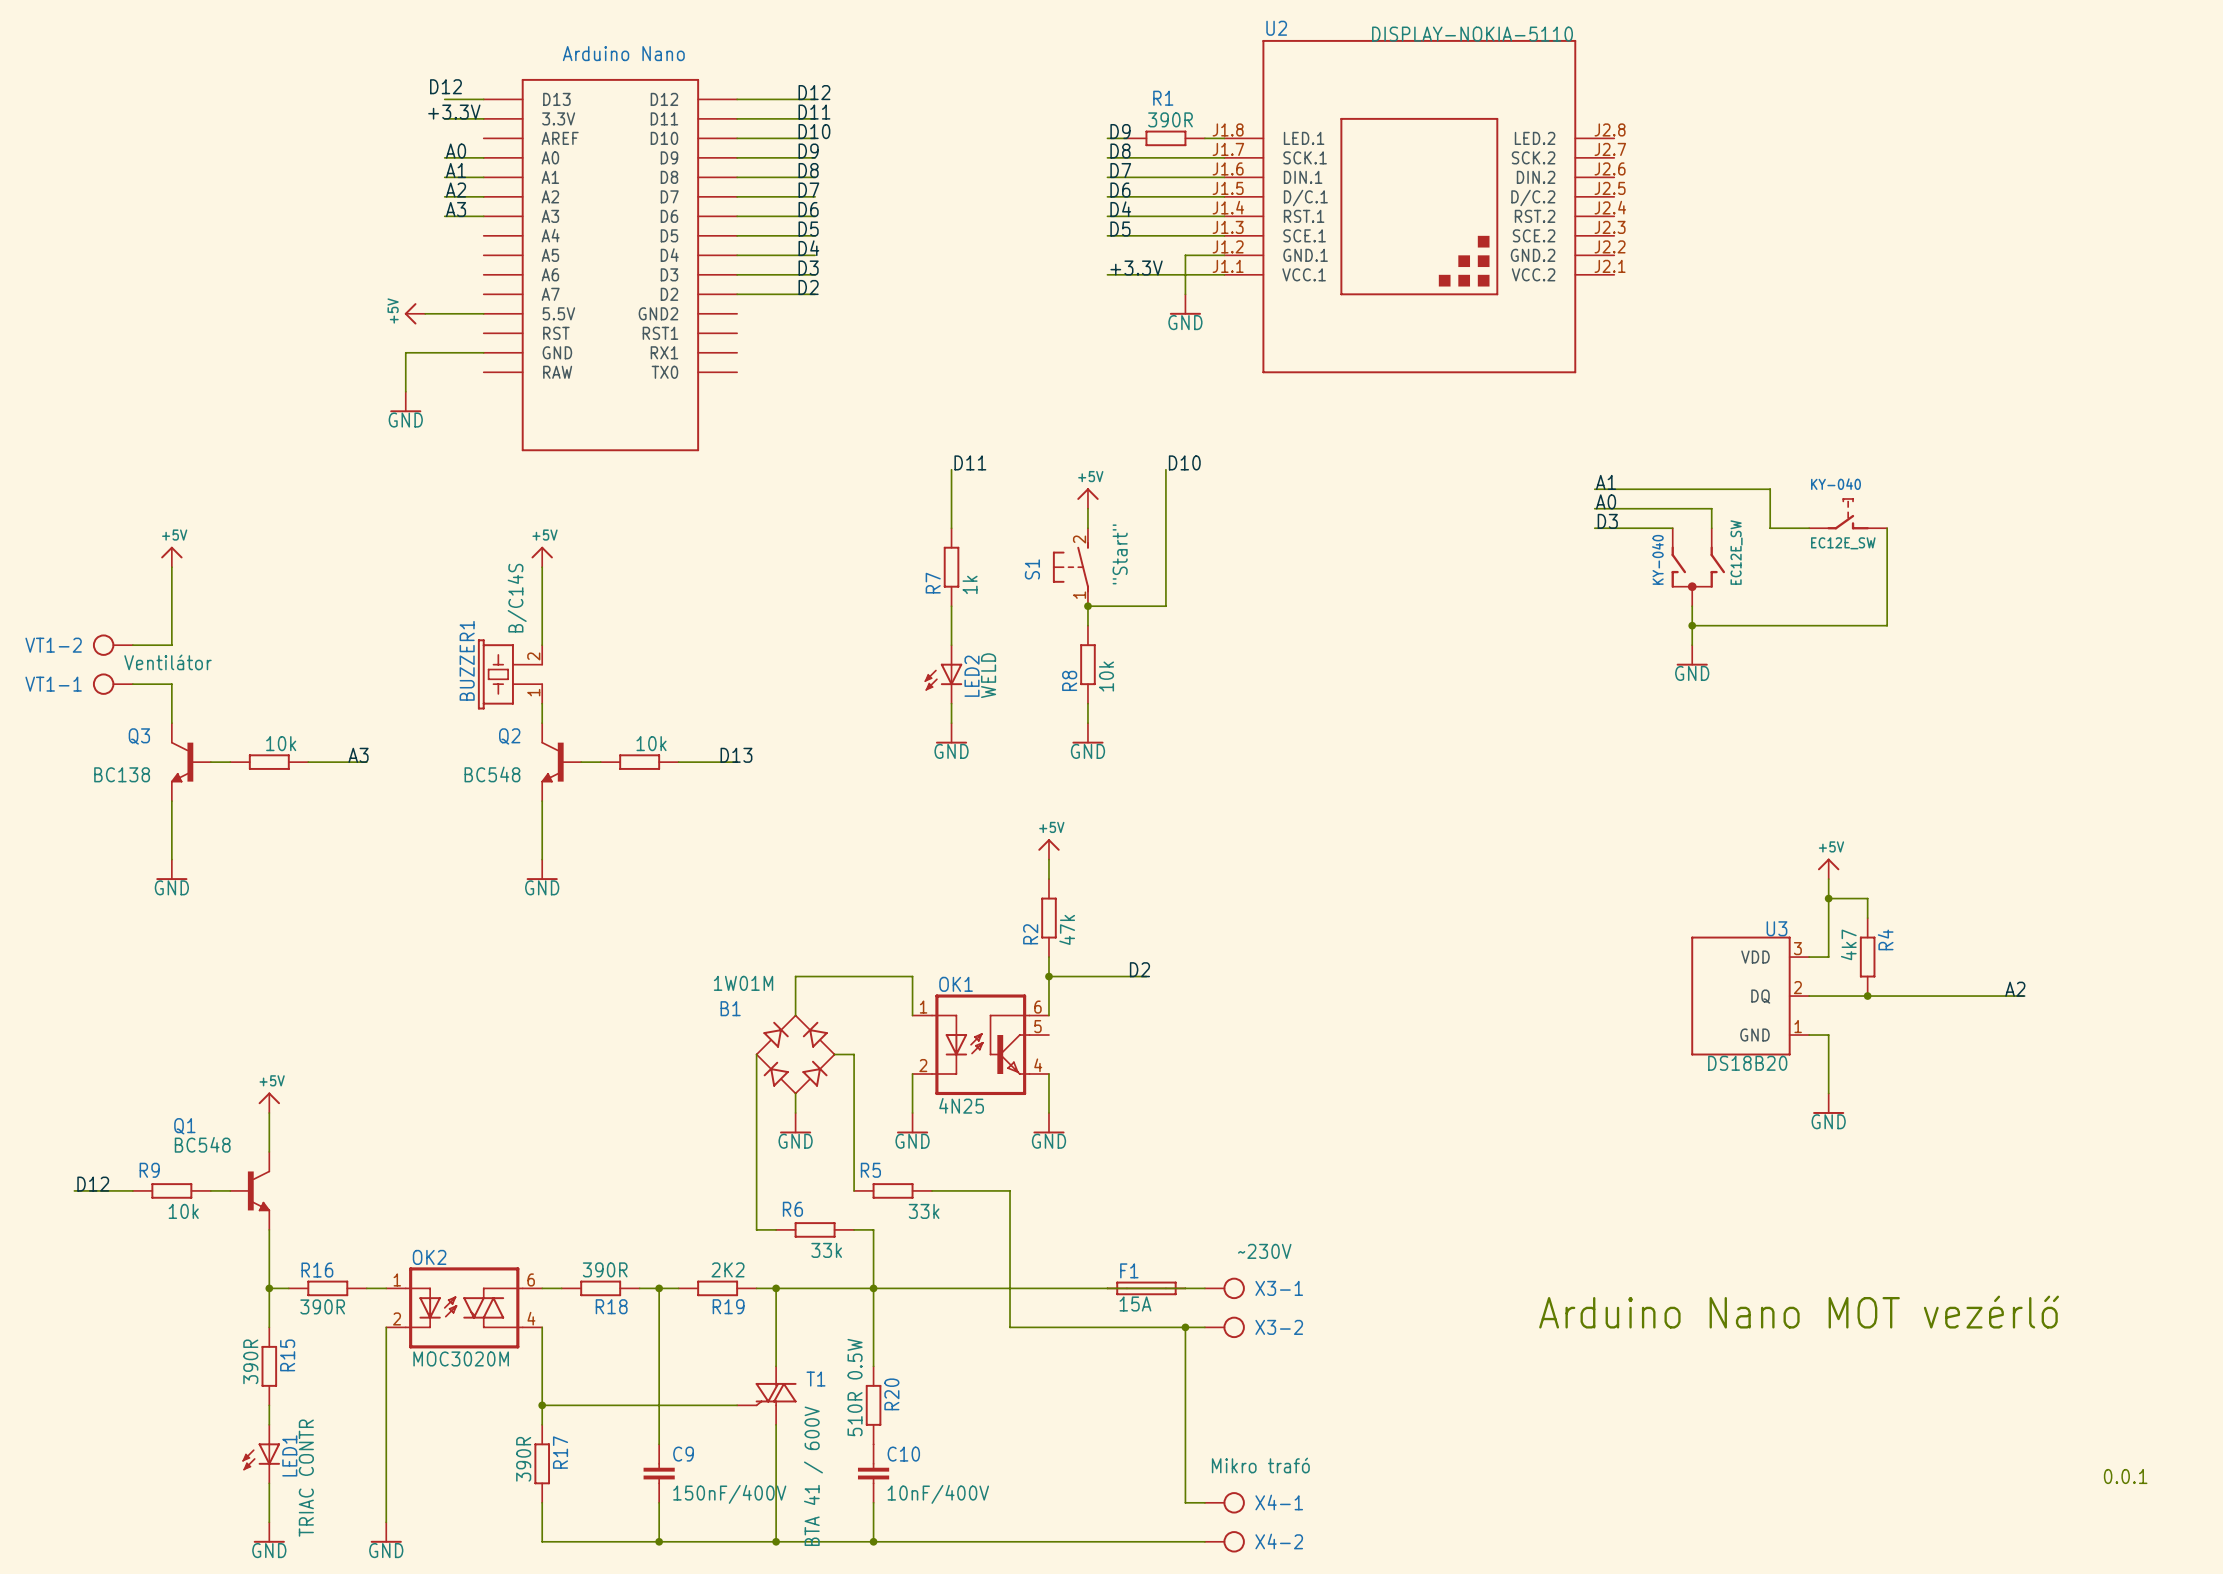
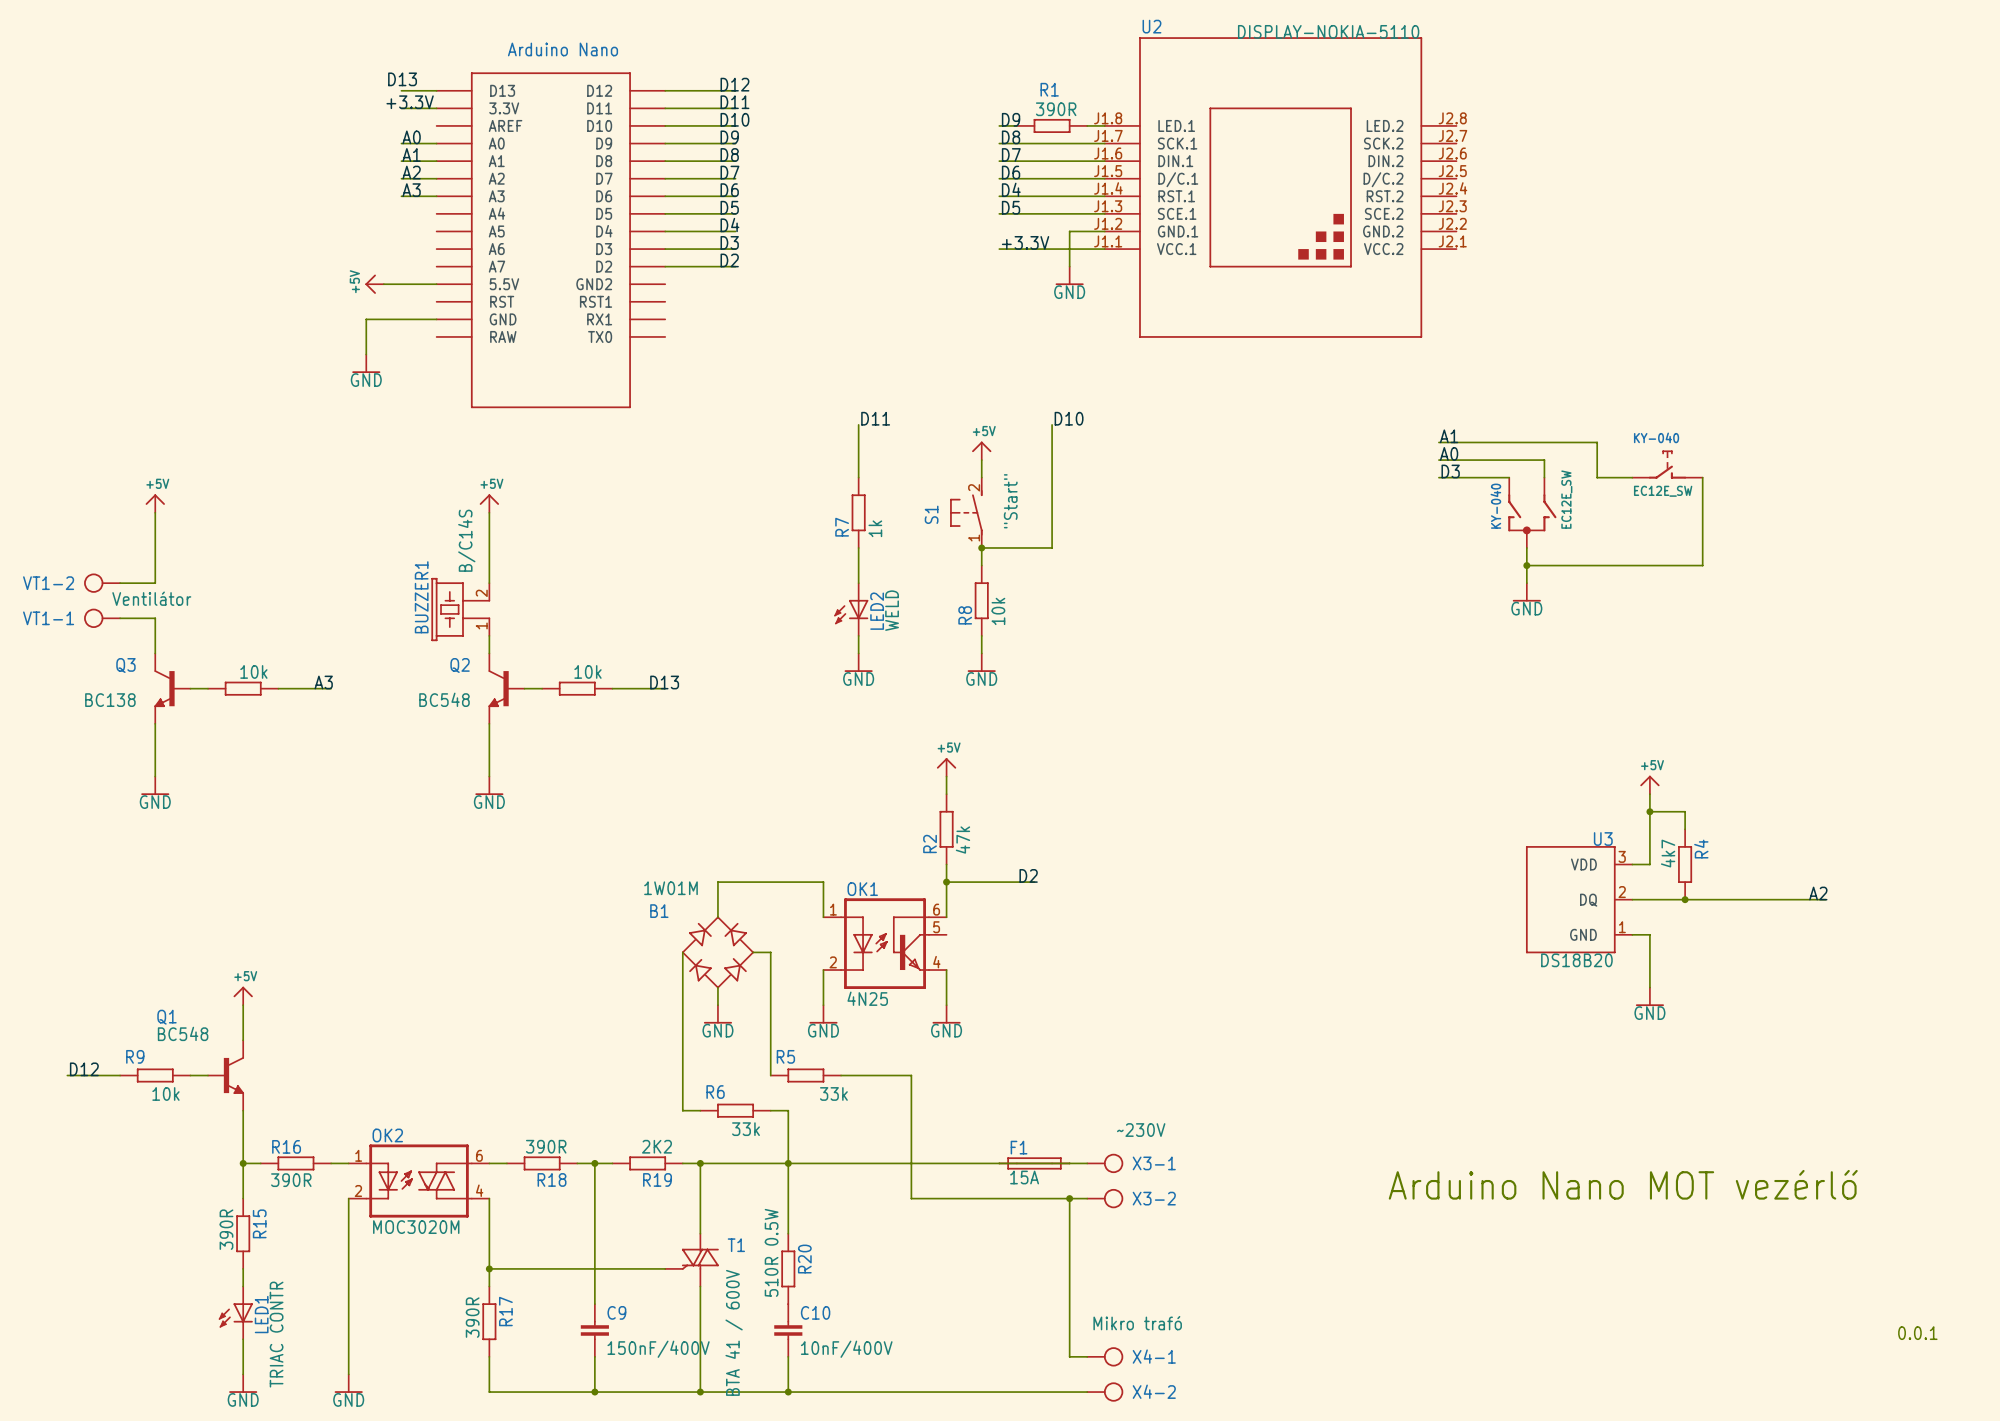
label: D12 (445, 86) -> D13 (402, 79)

